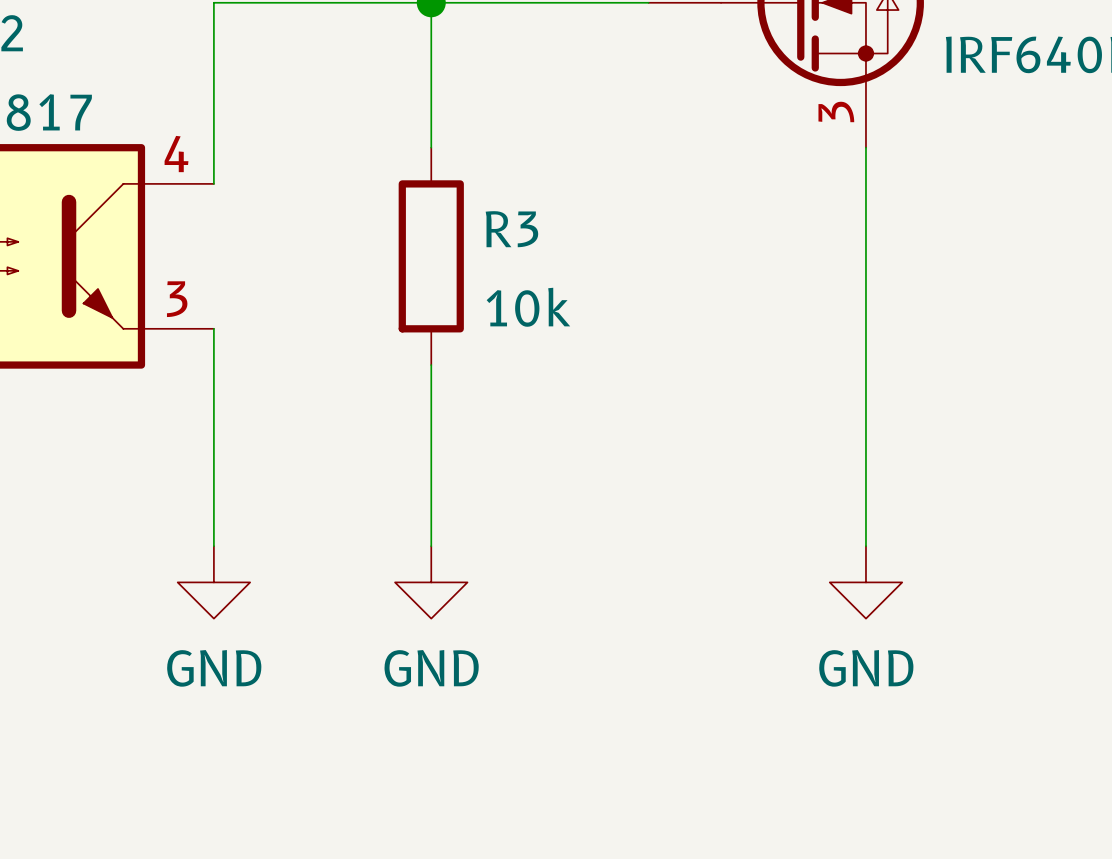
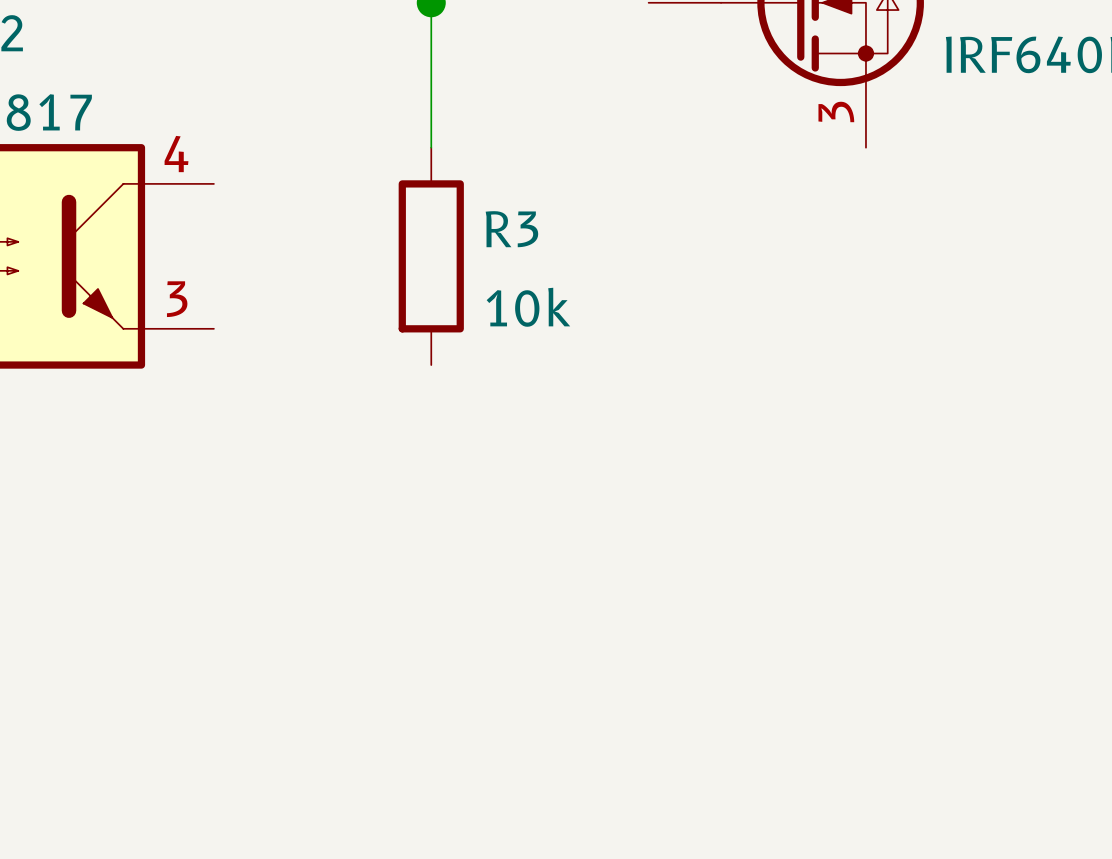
wire: (648, 2) (213, 2) (213, 183) -> none
wire: (865, 147) (865, 546) -> none
wire: (213, 328) (213, 546) -> none
wire: (431, 365) (431, 546) -> none
power symbol: GND (213, 582) -> none
power symbol: GND (431, 582) -> none
power symbol: GND (865, 582) -> none

